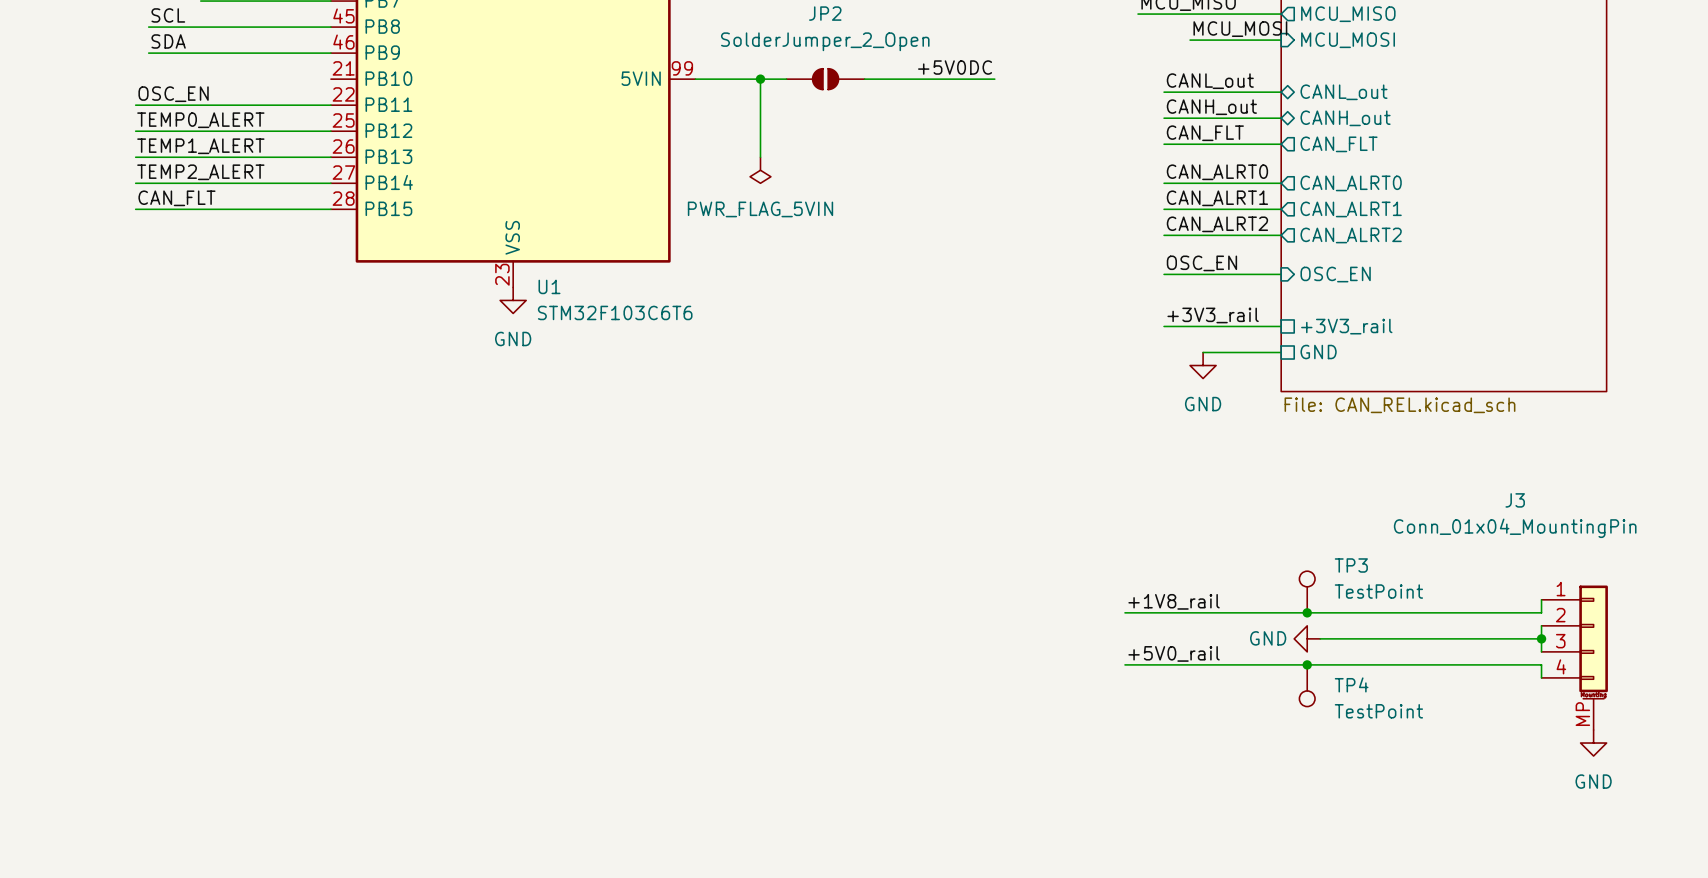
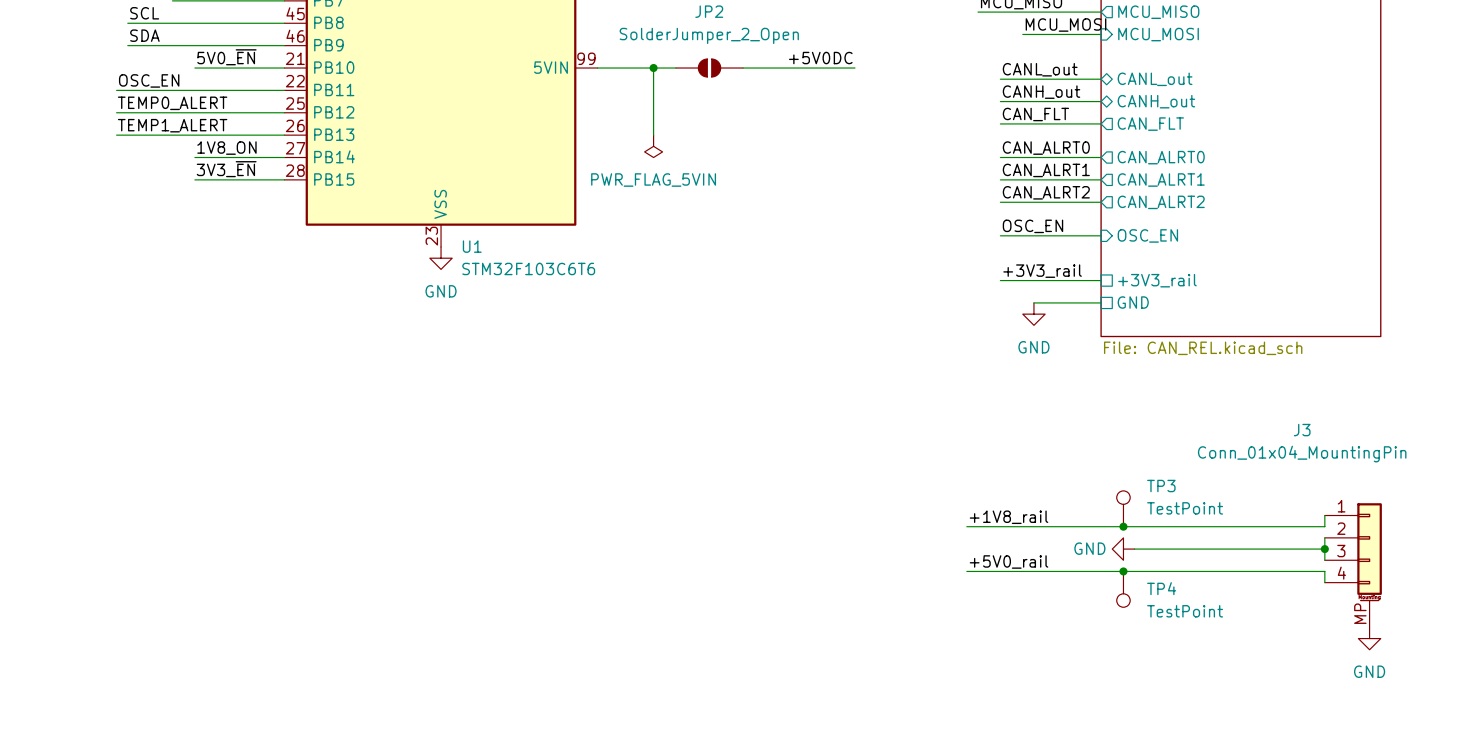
label: none -> 5V0_~{EN} (226, 57)
wire: none -> (194, 68) (284, 68)
label: TEMP2_ALERT (200, 172) -> none
label: none -> 1V8_ON (226, 148)
wire: (135, 183) (226, 183) -> none
label: none -> 3V3_~{EN} (226, 169)
label: CAN_FLT (176, 198) -> none
wire: (135, 209) (226, 209) -> none

